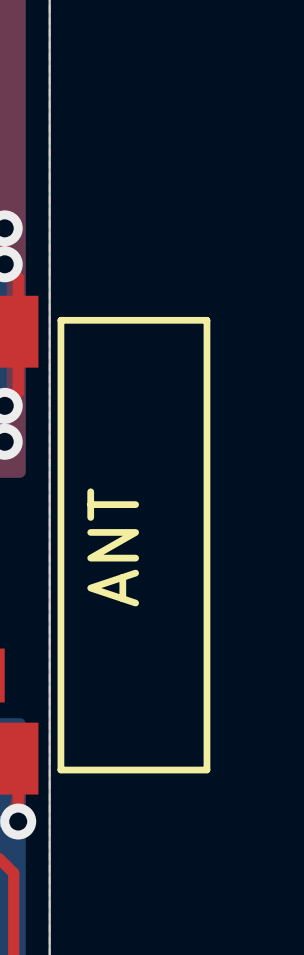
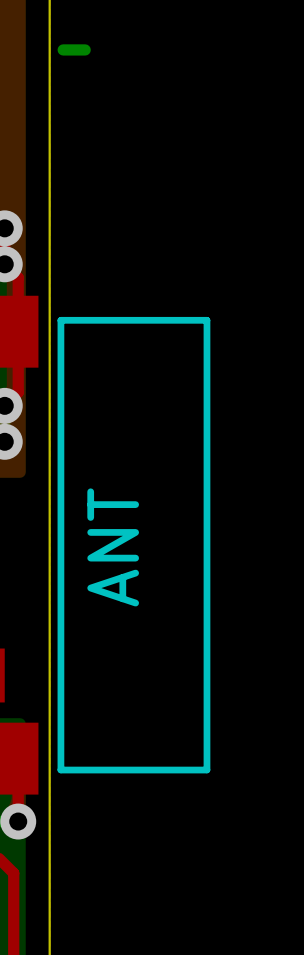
bottom track: none -> (63, 49) (85, 49)

